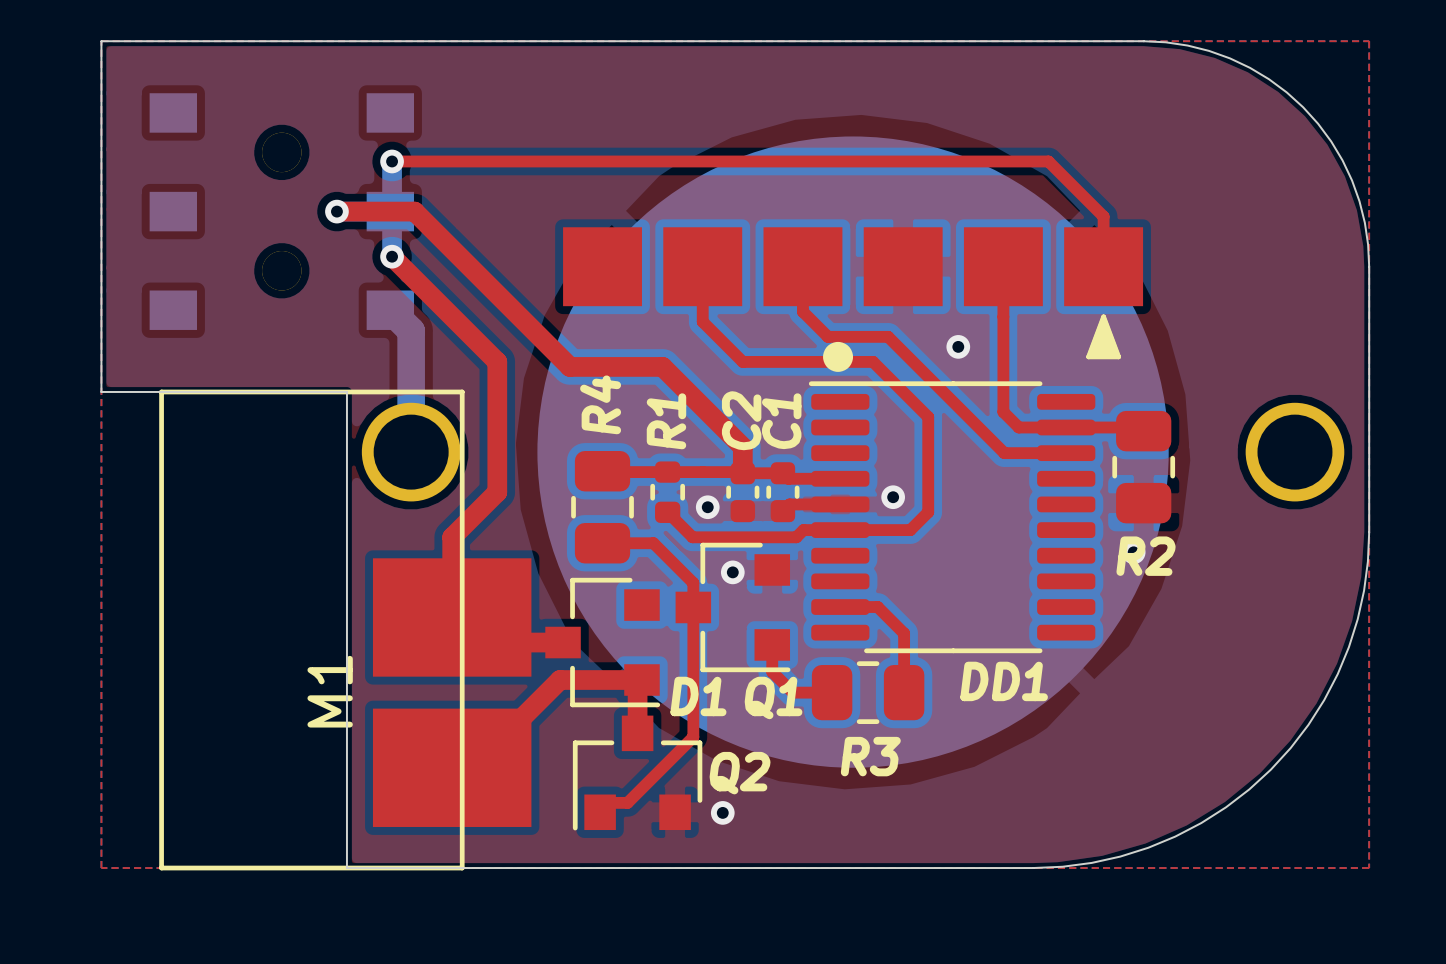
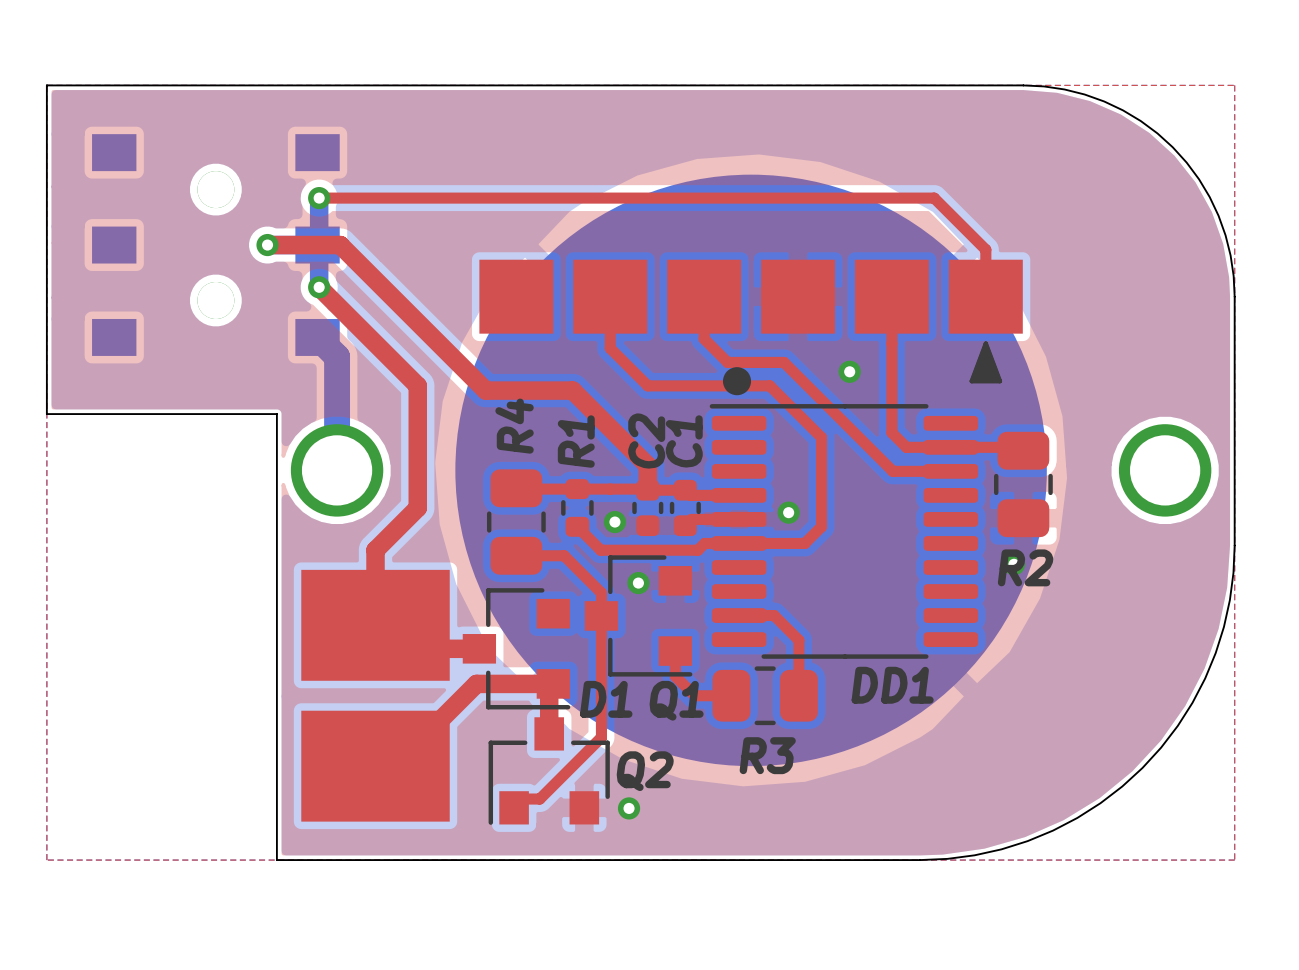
M1: (345, 630) -> none
part: none -> (375, 695)

